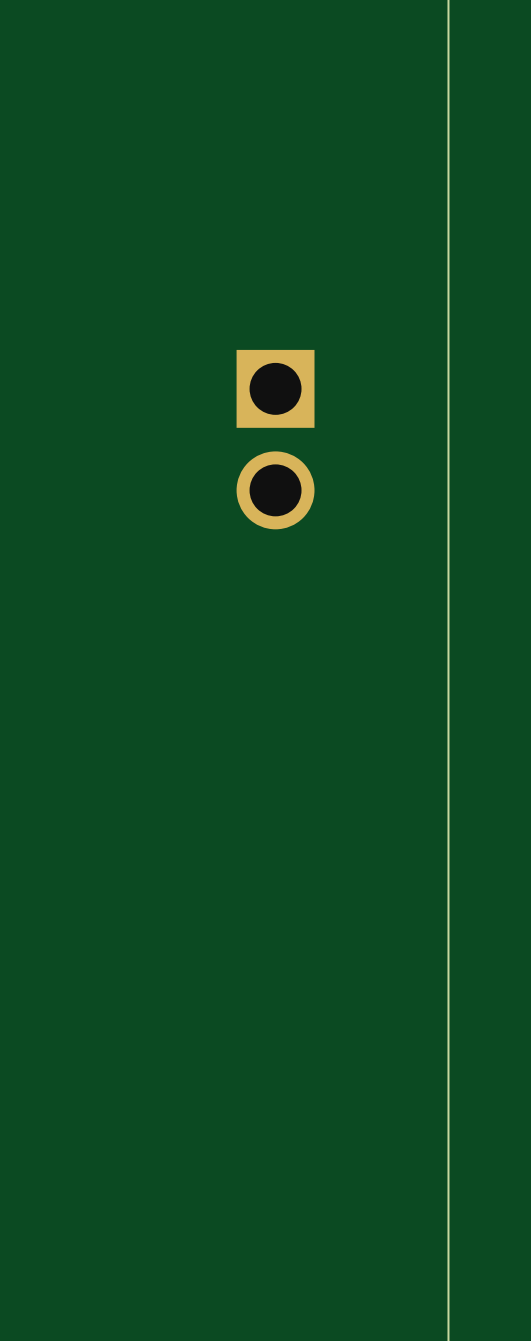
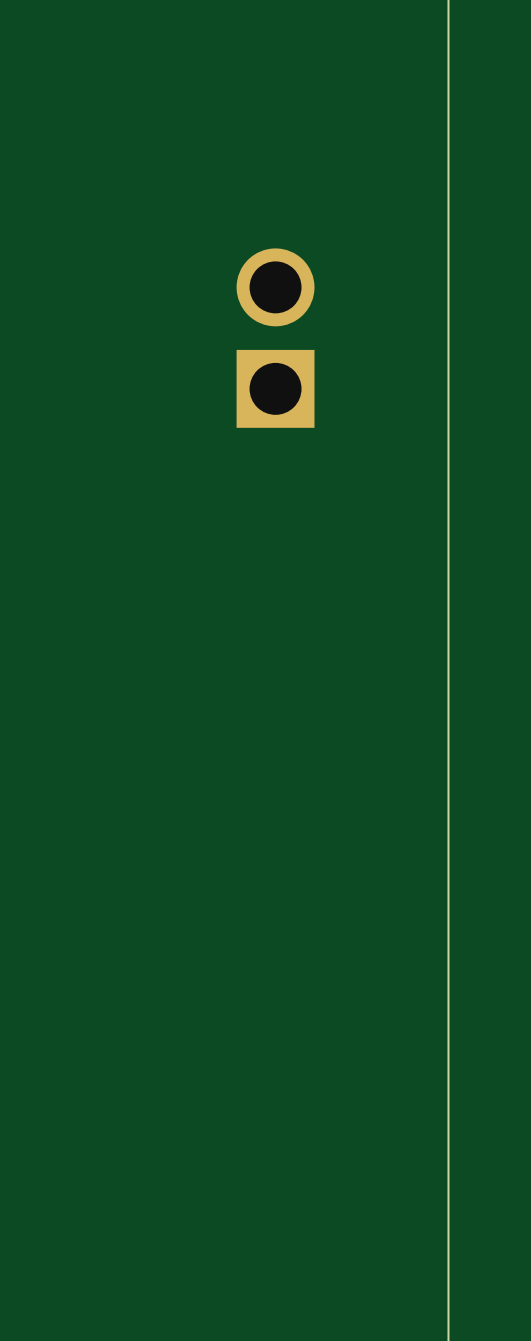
part rotation: 0° (275, 439) -> 180° (275, 338)

